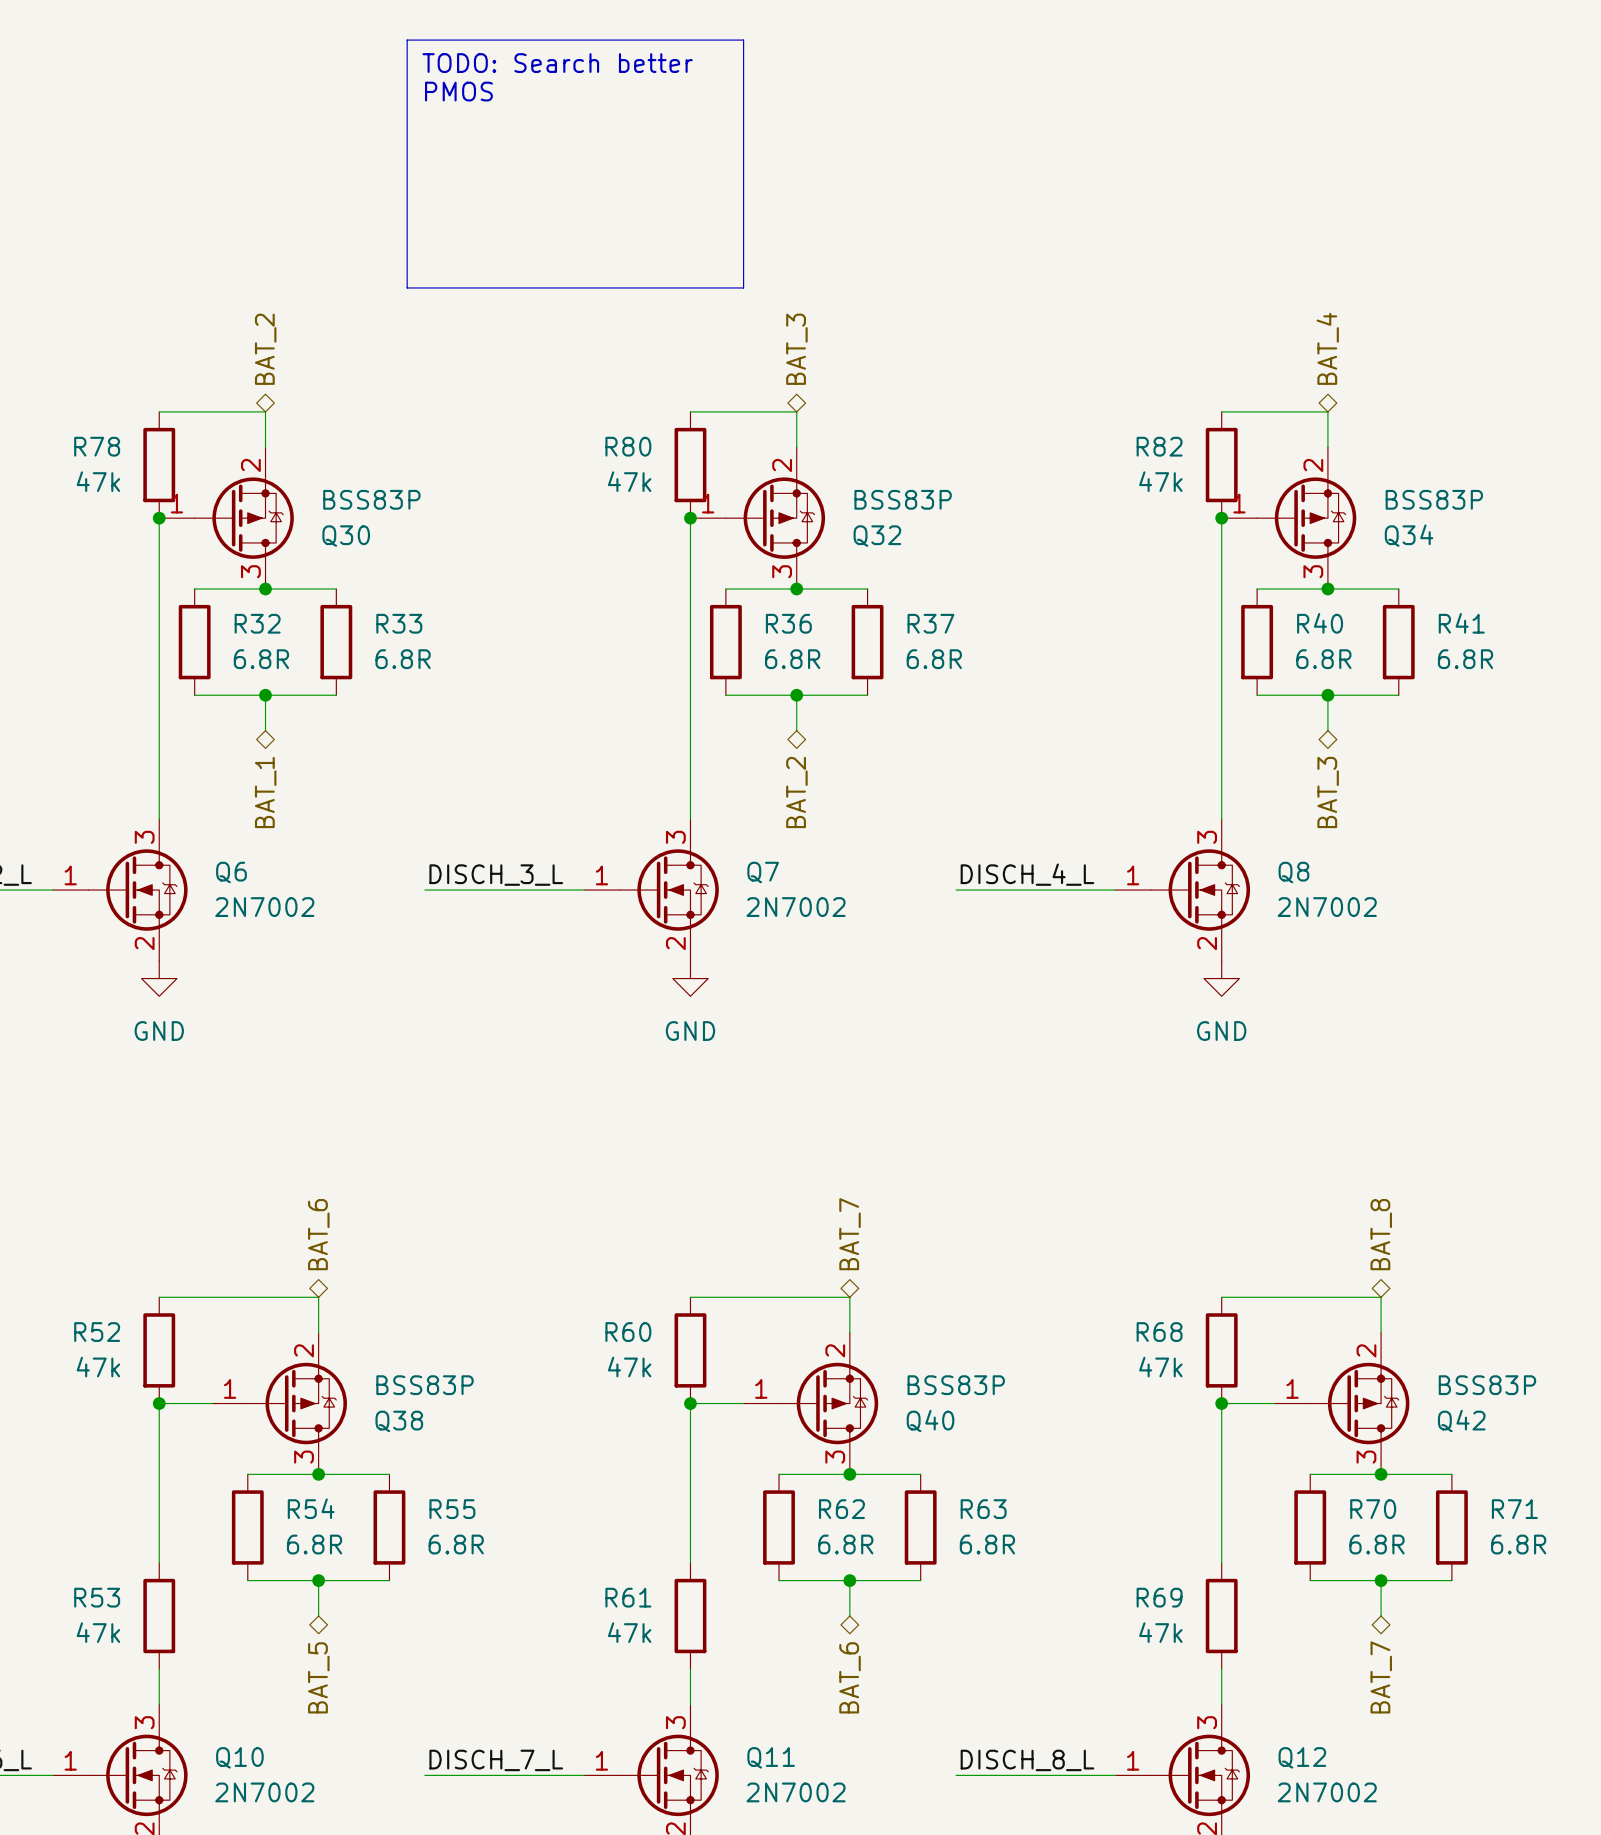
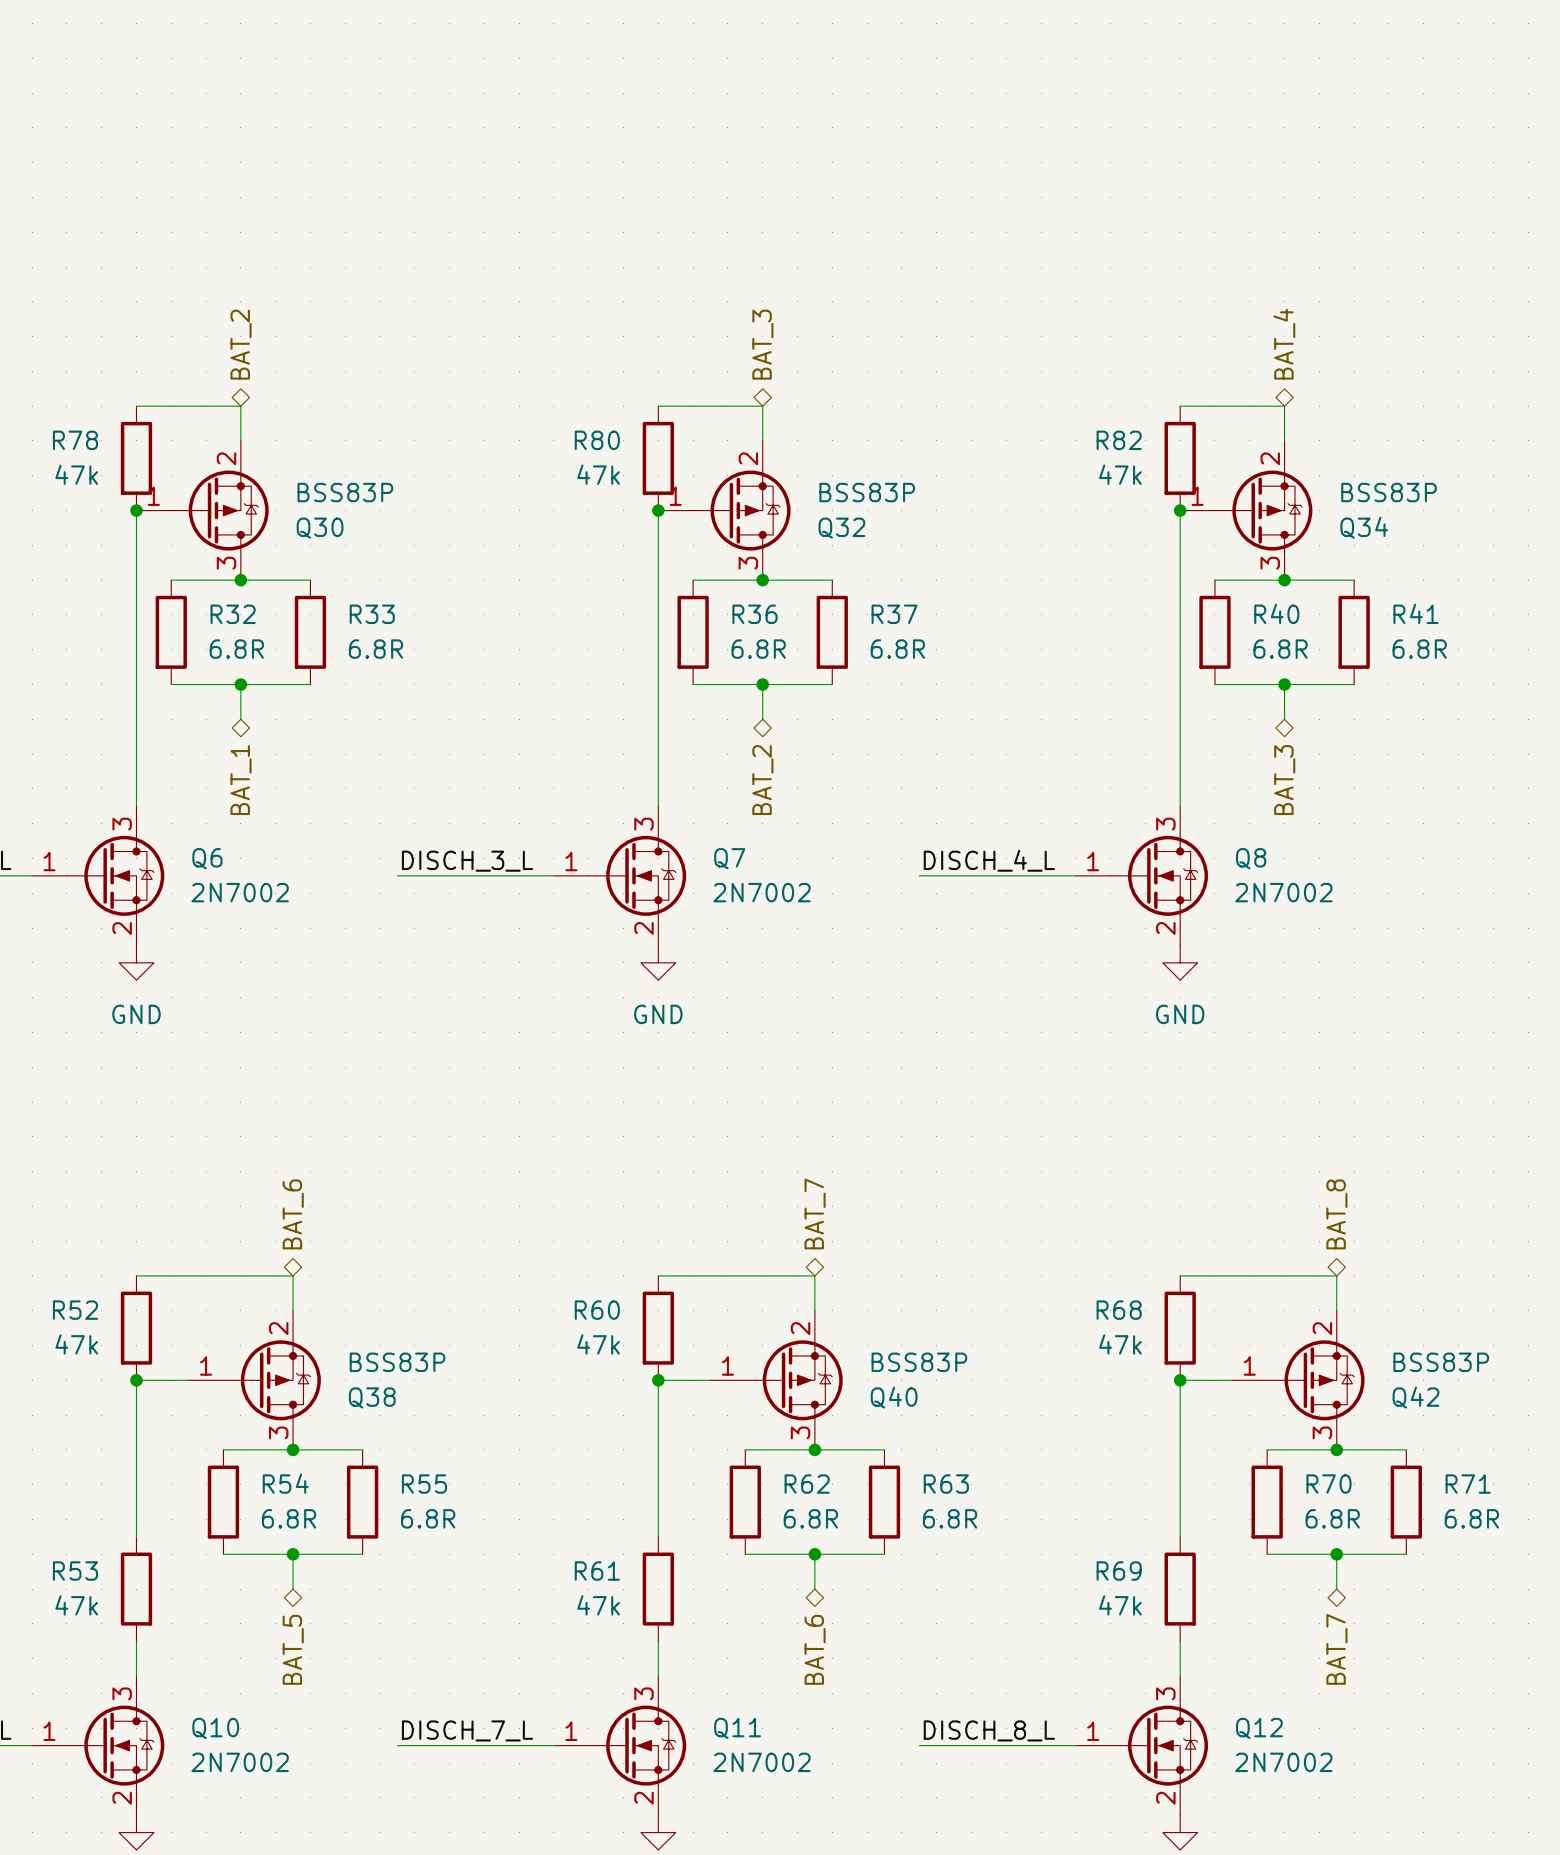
line: (407, 40) (743, 40) (743, 287) (407, 287) (407, 40) -> none
text: TODO: Search better (557, 63) -> none
text: PMOS (458, 91) -> none

